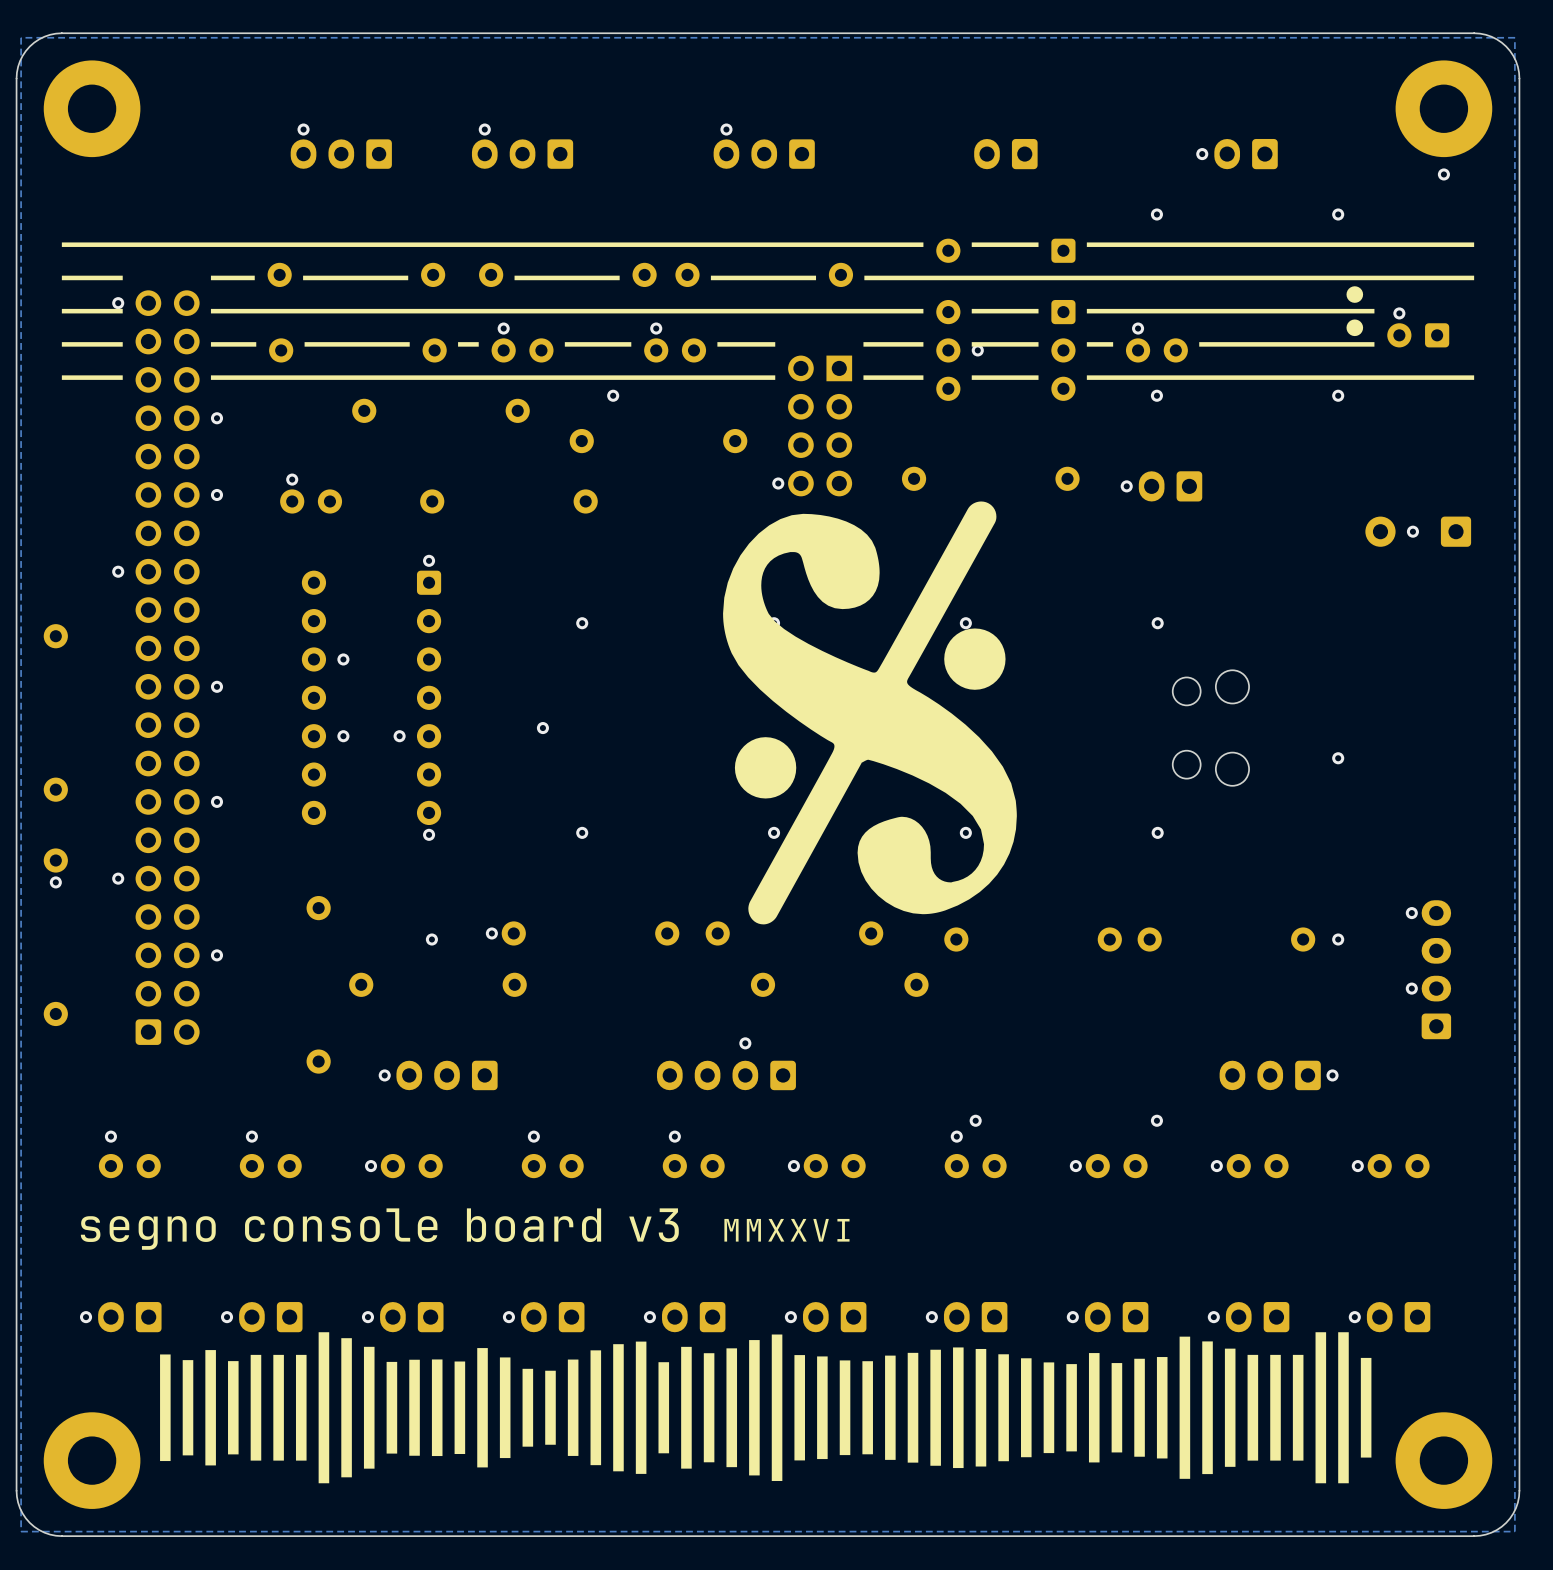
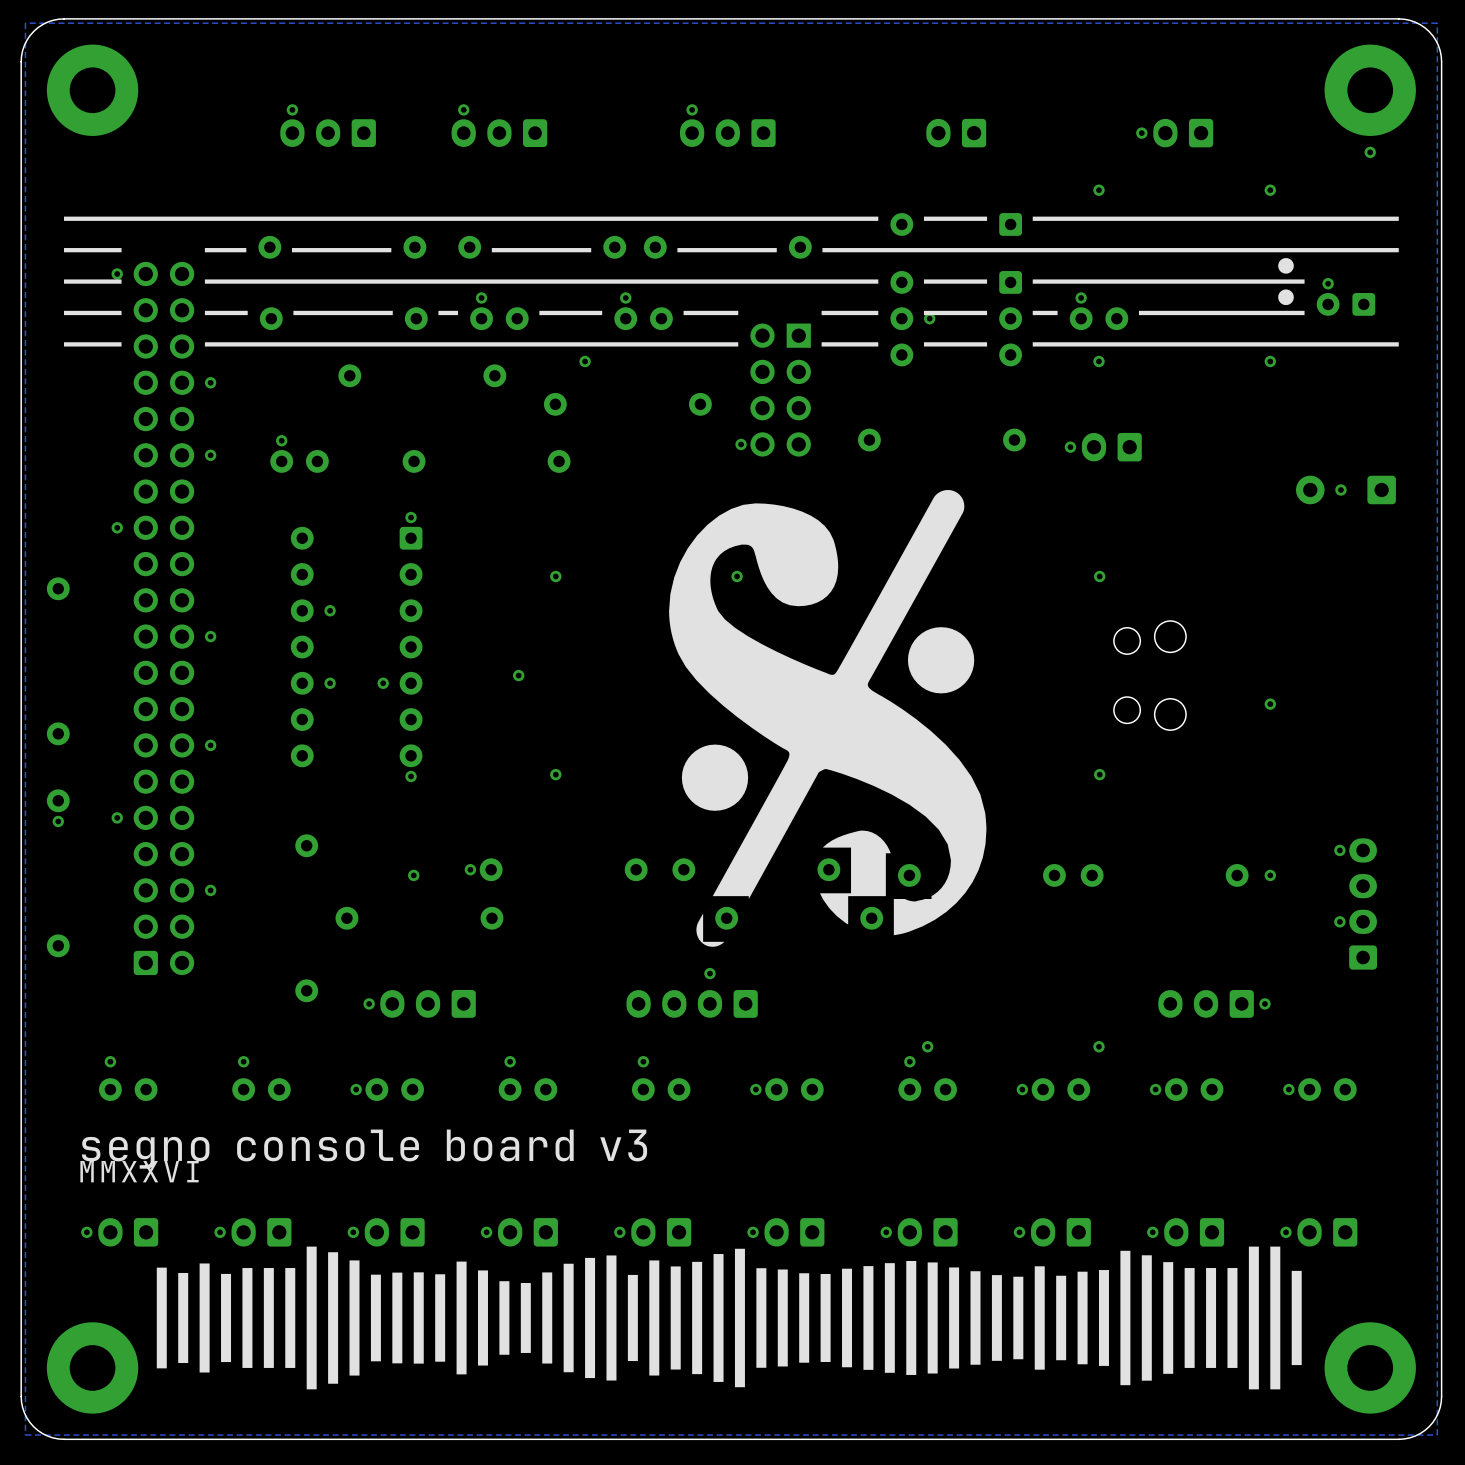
drawing: [723, 501, 1017, 925] -> none
drawing: none -> [669, 489, 987, 947]
drawing: [724, 1218, 850, 1242] -> none
drawing: none -> [80, 1160, 199, 1183]

